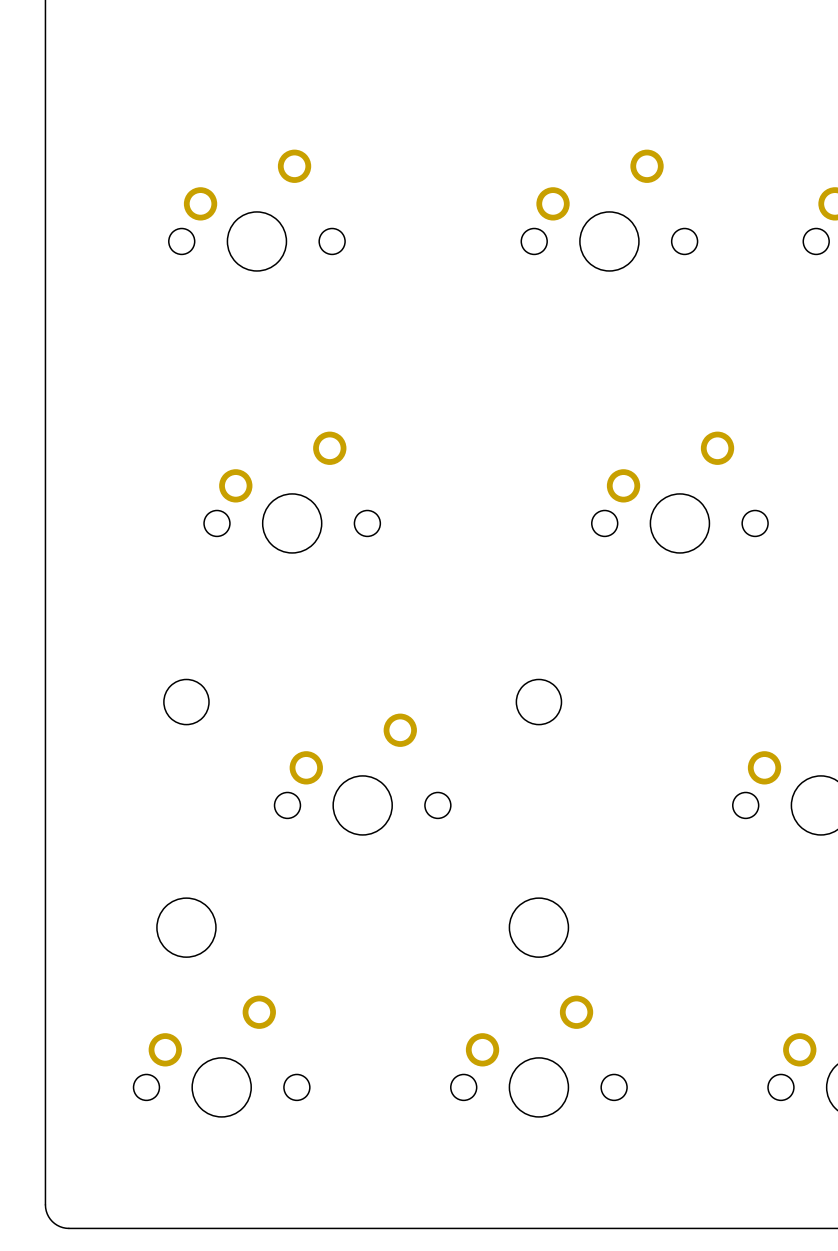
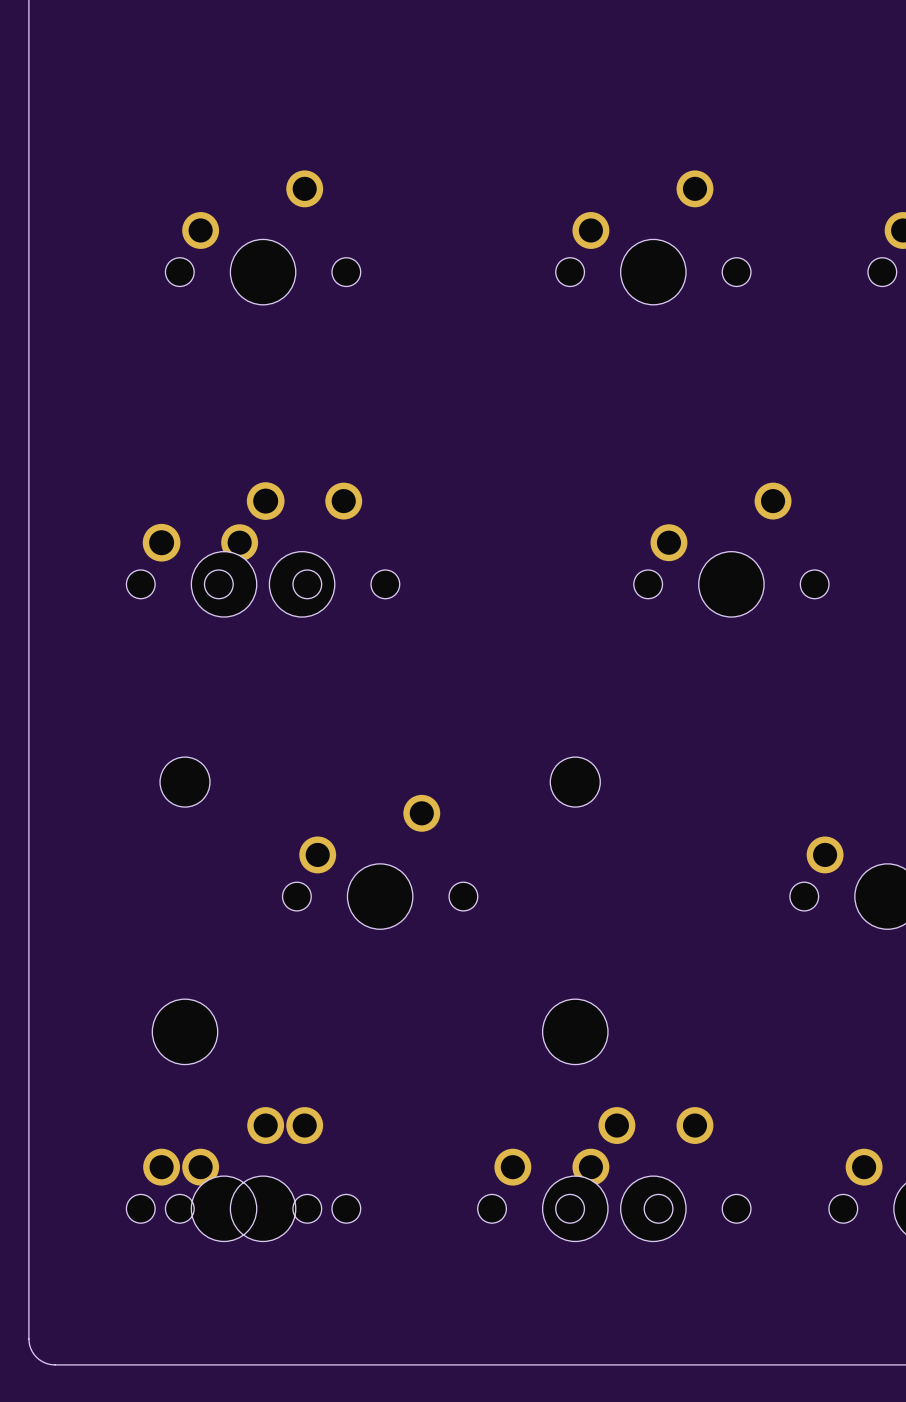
part: none -> (224, 549)
part: none -> (263, 1174)
part: none -> (653, 1174)

